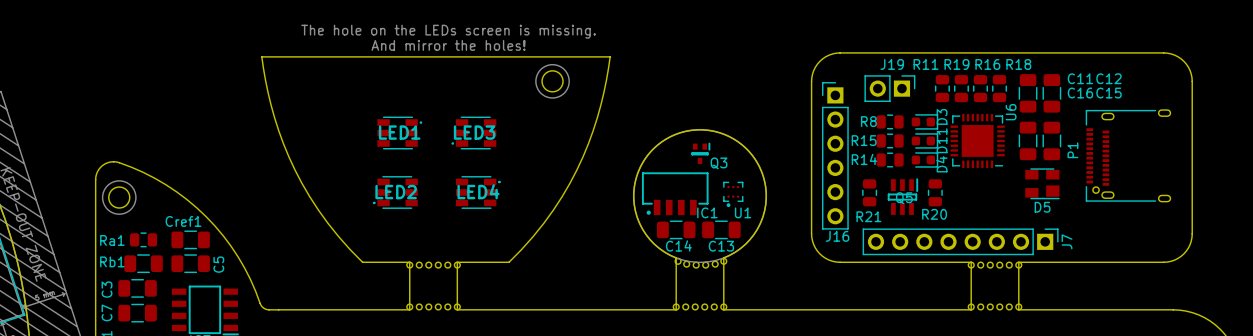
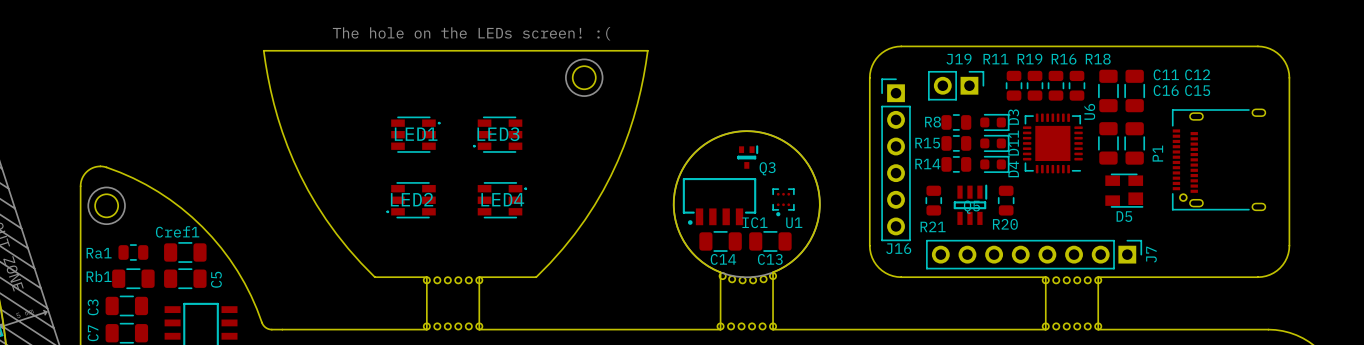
text: The hole on the LEDs screen is missing. (448, 31) -> none
text: And mirror the holes! (448, 45) -> The hole on the LEDs screen! :( (471, 33)

